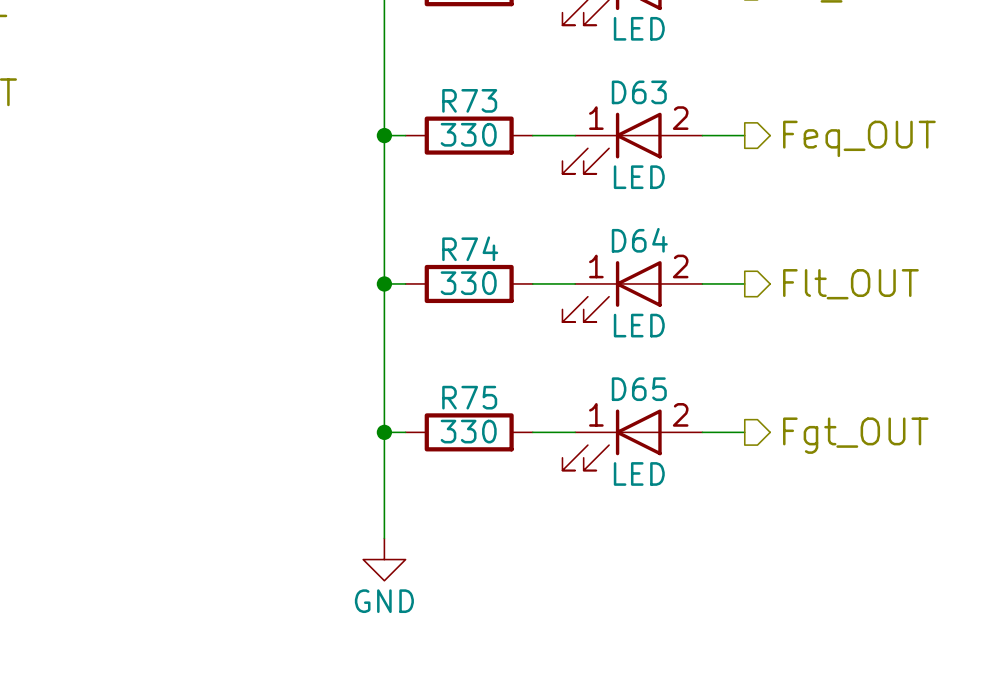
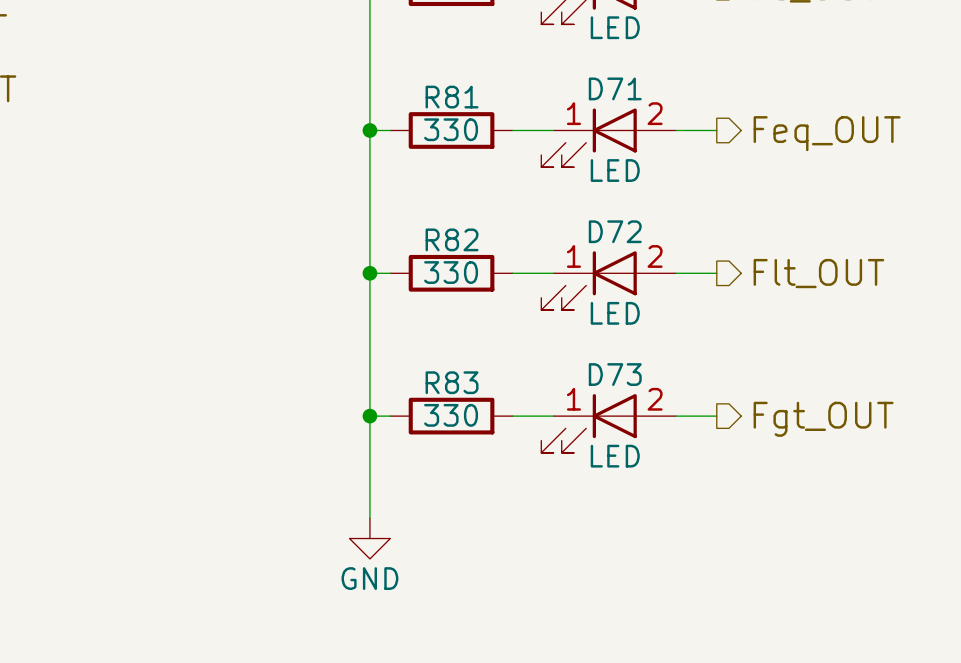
D63 name: D63 (639, 92) -> D71 (615, 88)
R73 name: R73 (469, 100) -> R81 (452, 97)
D64 name: D64 (639, 240) -> D72 (615, 231)
R74 name: R74 (470, 248) -> R82 (452, 239)
D65 name: D65 (639, 389) -> D73 (615, 374)
R75 name: R75 (469, 397) -> R83 (452, 382)

